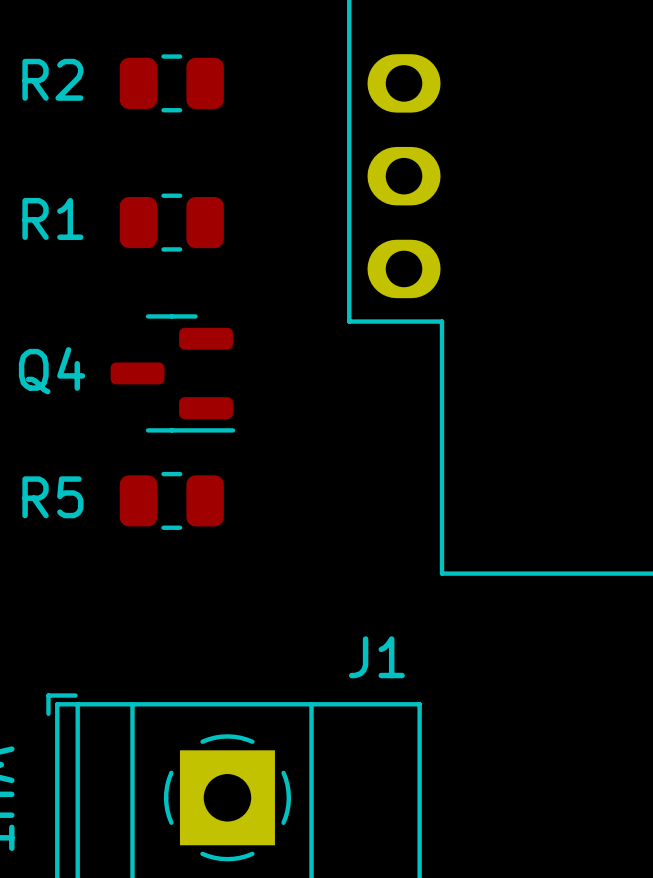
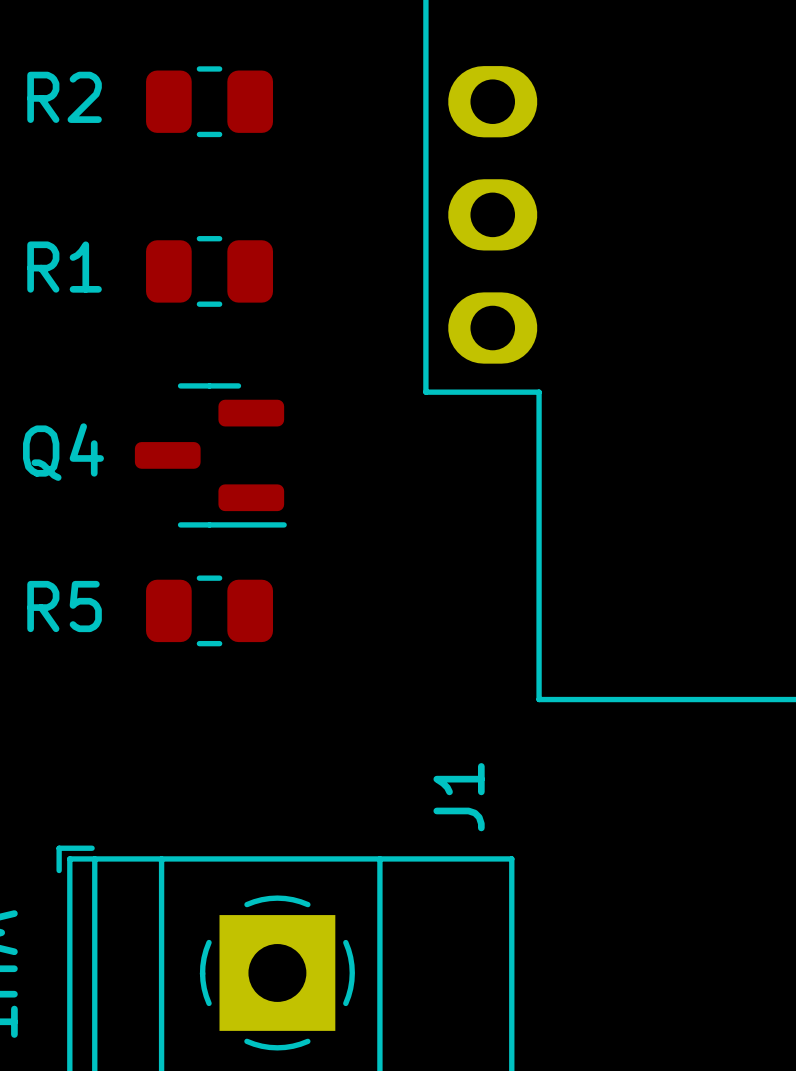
J1 name rotation: 0° (376, 657) -> 90° counterclockwise (459, 797)

